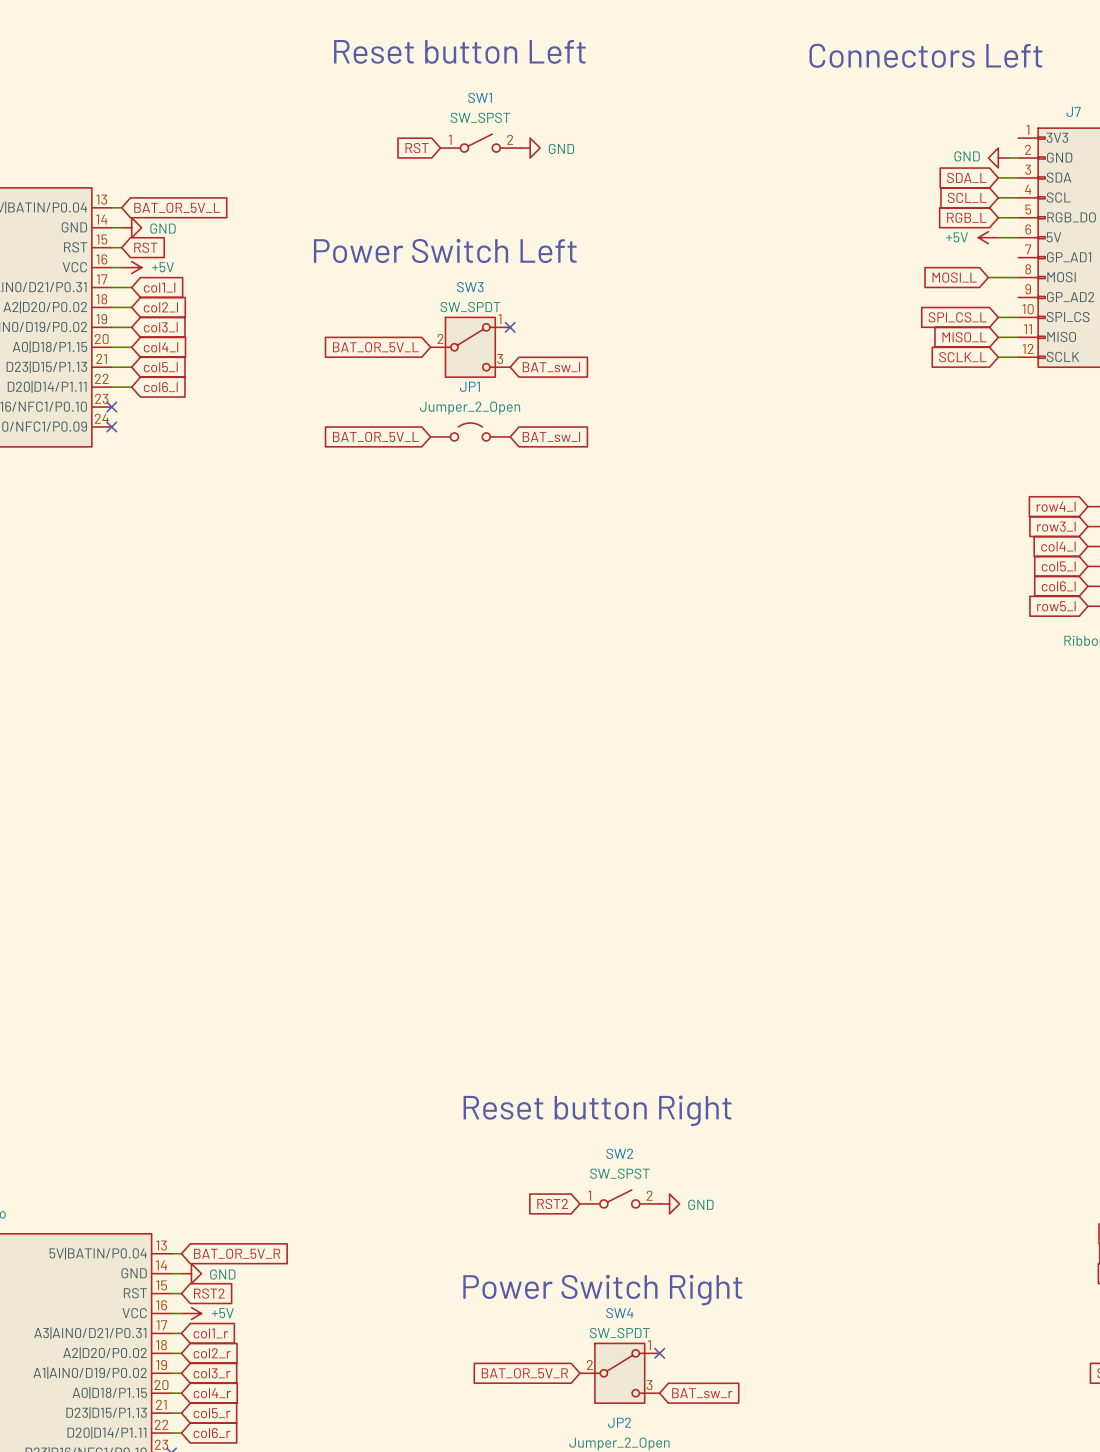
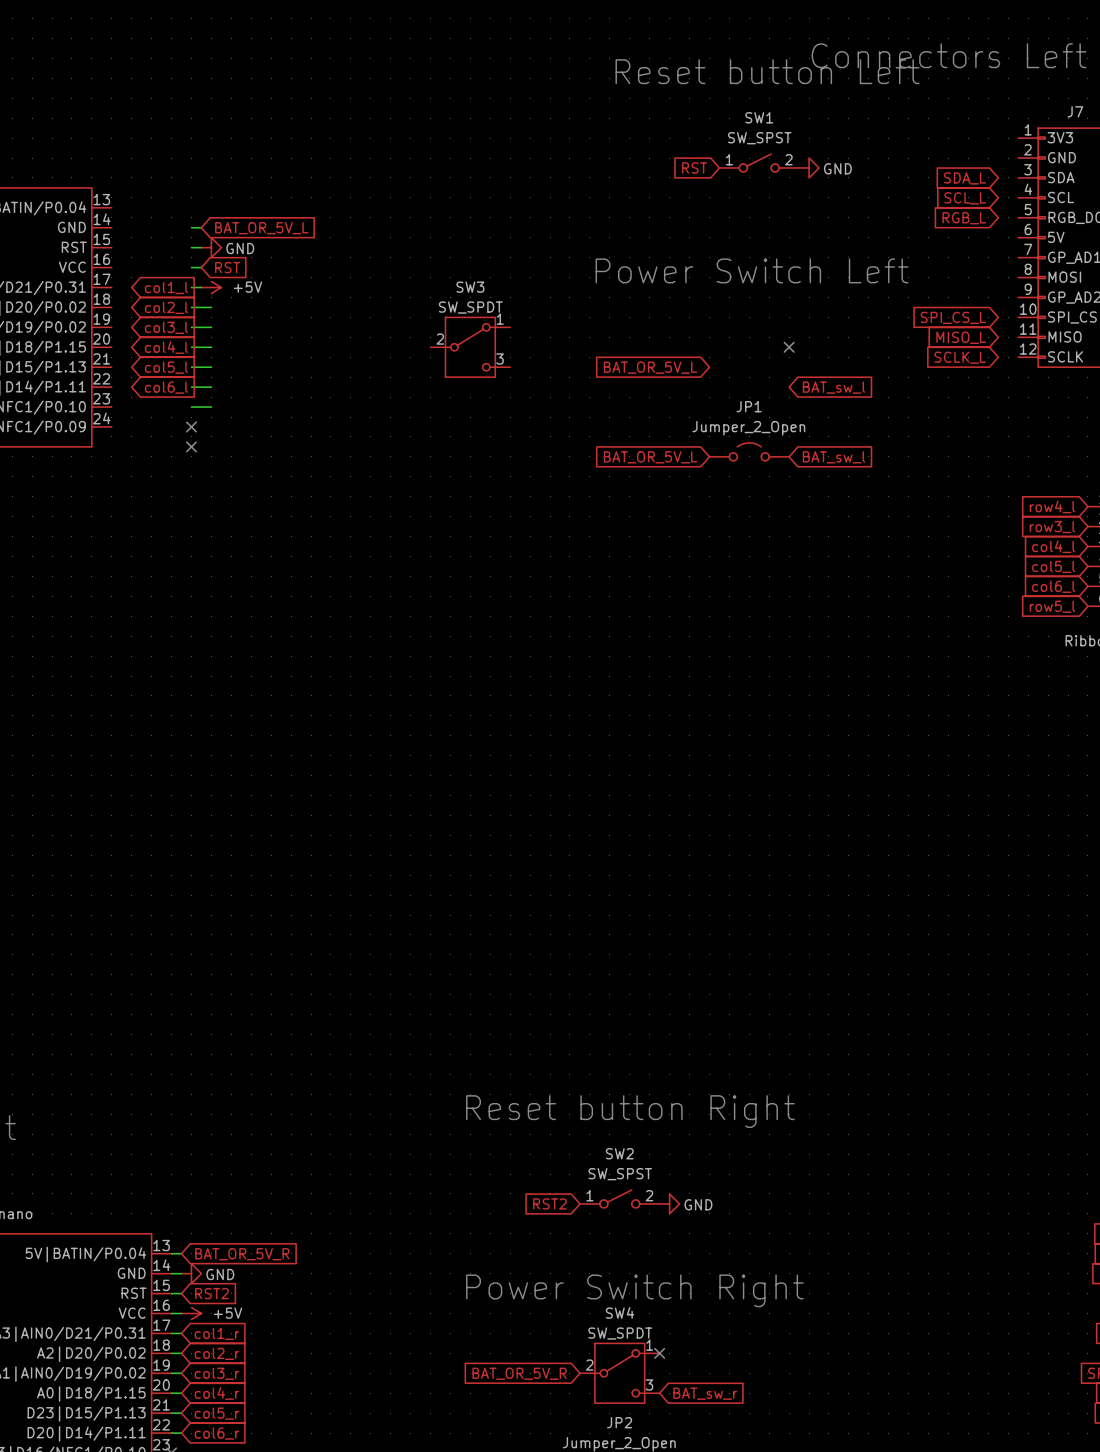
text: Reset button Left (459, 51) -> none
text: none -> Reset button Left (767, 71)
SW1 position: (480, 143) -> (759, 163)
global label: RST (417, 148) -> none
power symbol: GND (530, 148) -> none
power symbol: GND (998, 158) -> none
wire: (1008, 158) (1018, 158) -> none
global label: none -> RST (694, 167)
power symbol: none -> GND (809, 167)
wire: (998, 177) (1018, 177) -> none
wire: (998, 197) (1018, 197) -> none
wire: (111, 207) (121, 207) -> (191, 227) (201, 227)
global label position: BAT_OR_5V_L (177, 207) -> BAT_OR_5V_L (261, 228)
wire: (998, 217) (1018, 217) -> none
wire: (111, 227) (121, 227) -> (191, 247) (201, 247)
power symbol position: GND (131, 227) -> GND (211, 247)
power symbol: +5V (988, 237) -> none
wire: (998, 237) (1018, 237) -> none
wire: (111, 247) (121, 247) -> (191, 267) (201, 267)
global label position: RST (145, 247) -> RST (227, 267)
text: Power Switch Left (445, 250) -> none
wire: (111, 267) (121, 267) -> (191, 287) (201, 287)
power symbol position: +5V (131, 267) -> +5V (211, 287)
text: none -> Power Switch Left (752, 270)
global label: MOSI_L (954, 277) -> none
wire: (988, 277) (1018, 277) -> none
wire: (111, 287) (131, 287) -> (191, 307) (211, 307)
wire: (111, 307) (131, 307) -> (191, 327) (211, 327)
wire: (998, 317) (1018, 317) -> none
wire: (111, 327) (131, 327) -> (191, 347) (211, 347)
no-connect mark: (510, 327) -> none
wire: (998, 337) (1018, 337) -> none
wire: (111, 347) (131, 347) -> (191, 367) (211, 367)
global label: BAT_OR_5V_L (375, 347) -> none
no-connect mark: none -> (789, 347)
wire: (998, 357) (1018, 357) -> none
wire: (111, 367) (131, 367) -> (191, 387) (211, 387)
global label: BAT_sw_l (551, 367) -> none
global label: none -> BAT_OR_5V_L (650, 367)
wire: (111, 387) (131, 387) -> (191, 407) (211, 407)
global label: none -> BAT_sw_l (834, 387)
no-connect mark: (111, 407) -> none
no-connect mark: (111, 426) -> none
no-connect mark: none -> (191, 426)
JP1 position: (470, 431) -> (749, 451)
global label: BAT_OR_5V_L (375, 436) -> none
global label: BAT_sw_l (551, 436) -> none
no-connect mark: none -> (191, 446)
global label: none -> BAT_OR_5V_L (650, 457)
global label: none -> BAT_sw_l (834, 457)

